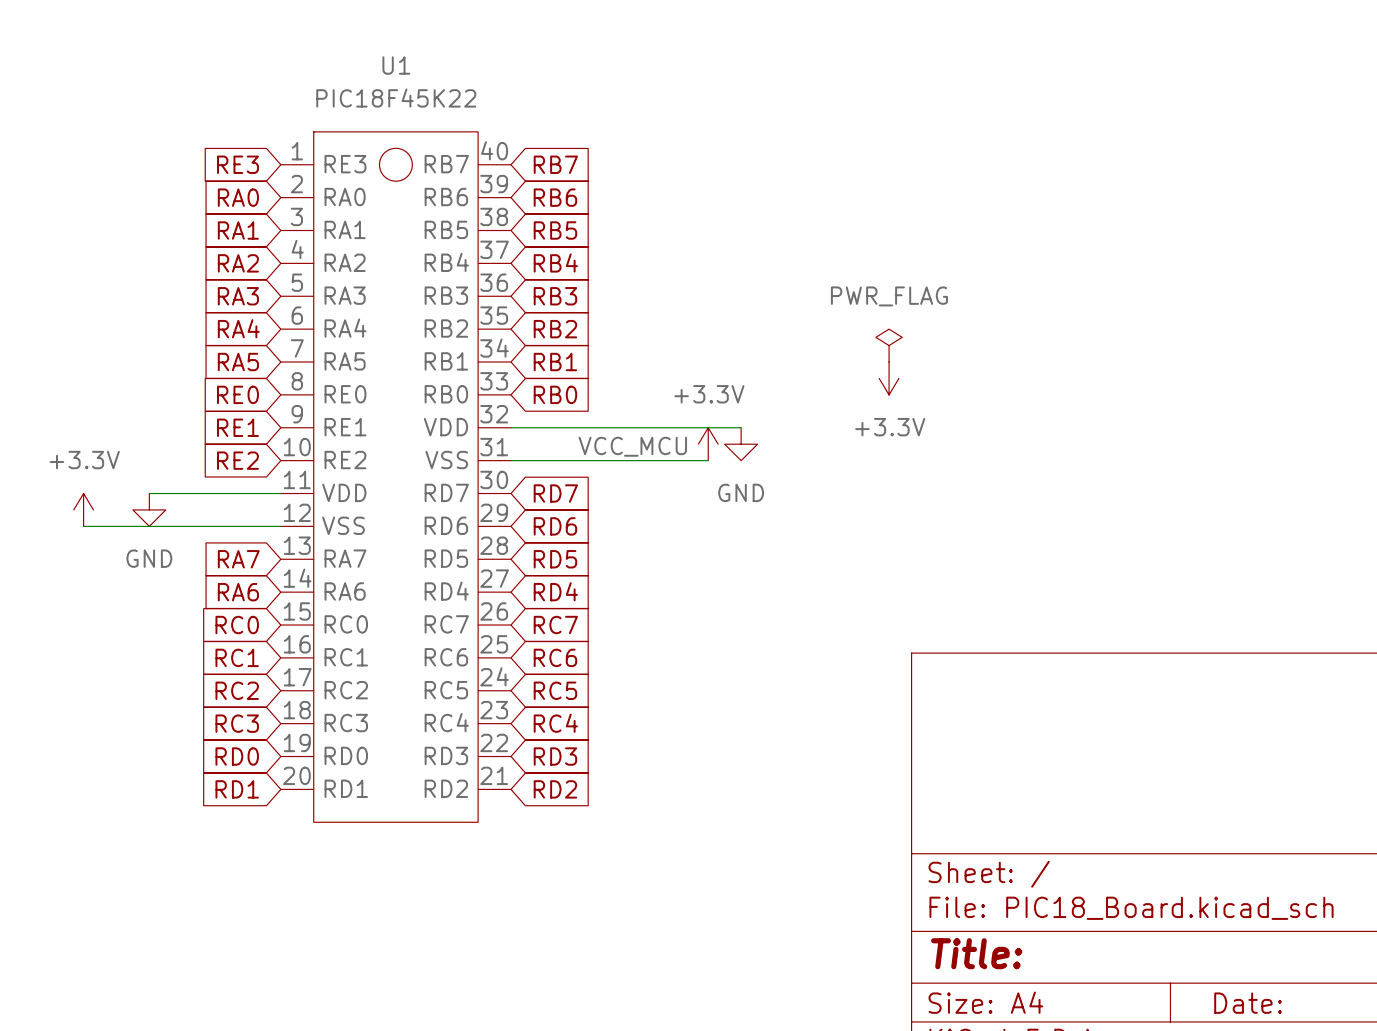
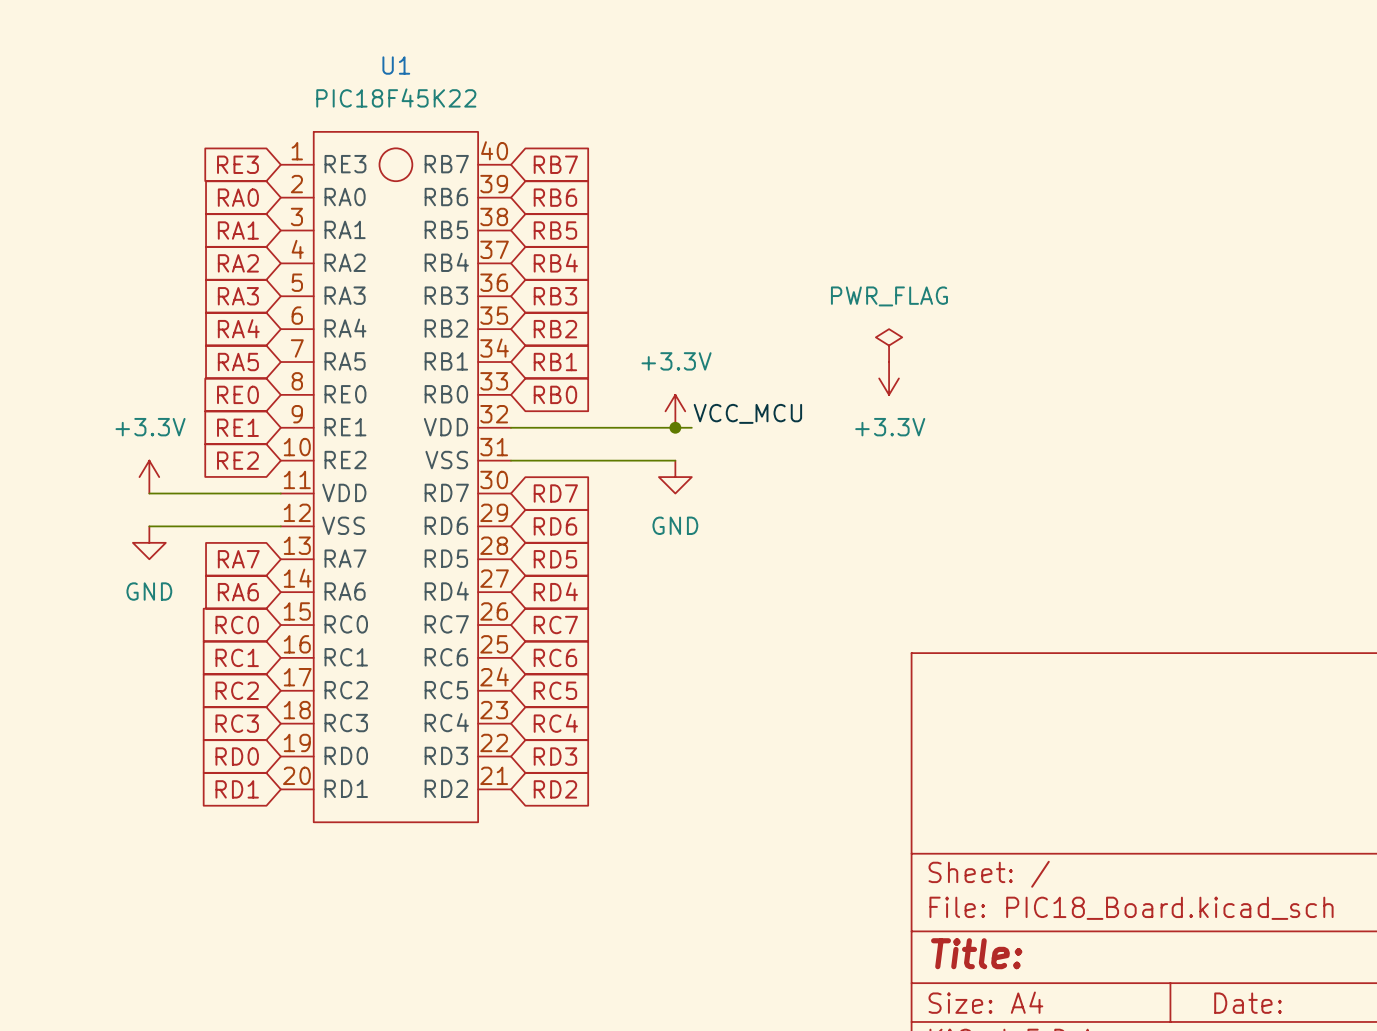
junction: none -> (675, 427)
wire: (691, 427) (741, 427) -> none
power symbol position: +3.3V (708, 444) -> +3.3V (675, 411)
power symbol position: GND (741, 444) -> GND (675, 477)
label position: VCC_MCU (632, 446) -> VCC_MCU (747, 413)
wire: (675, 460) (708, 460) -> none
power symbol position: +3.3V (83, 509) -> +3.3V (149, 477)
power symbol position: GND (149, 509) -> GND (149, 542)
wire: (83, 526) (149, 526) -> none

